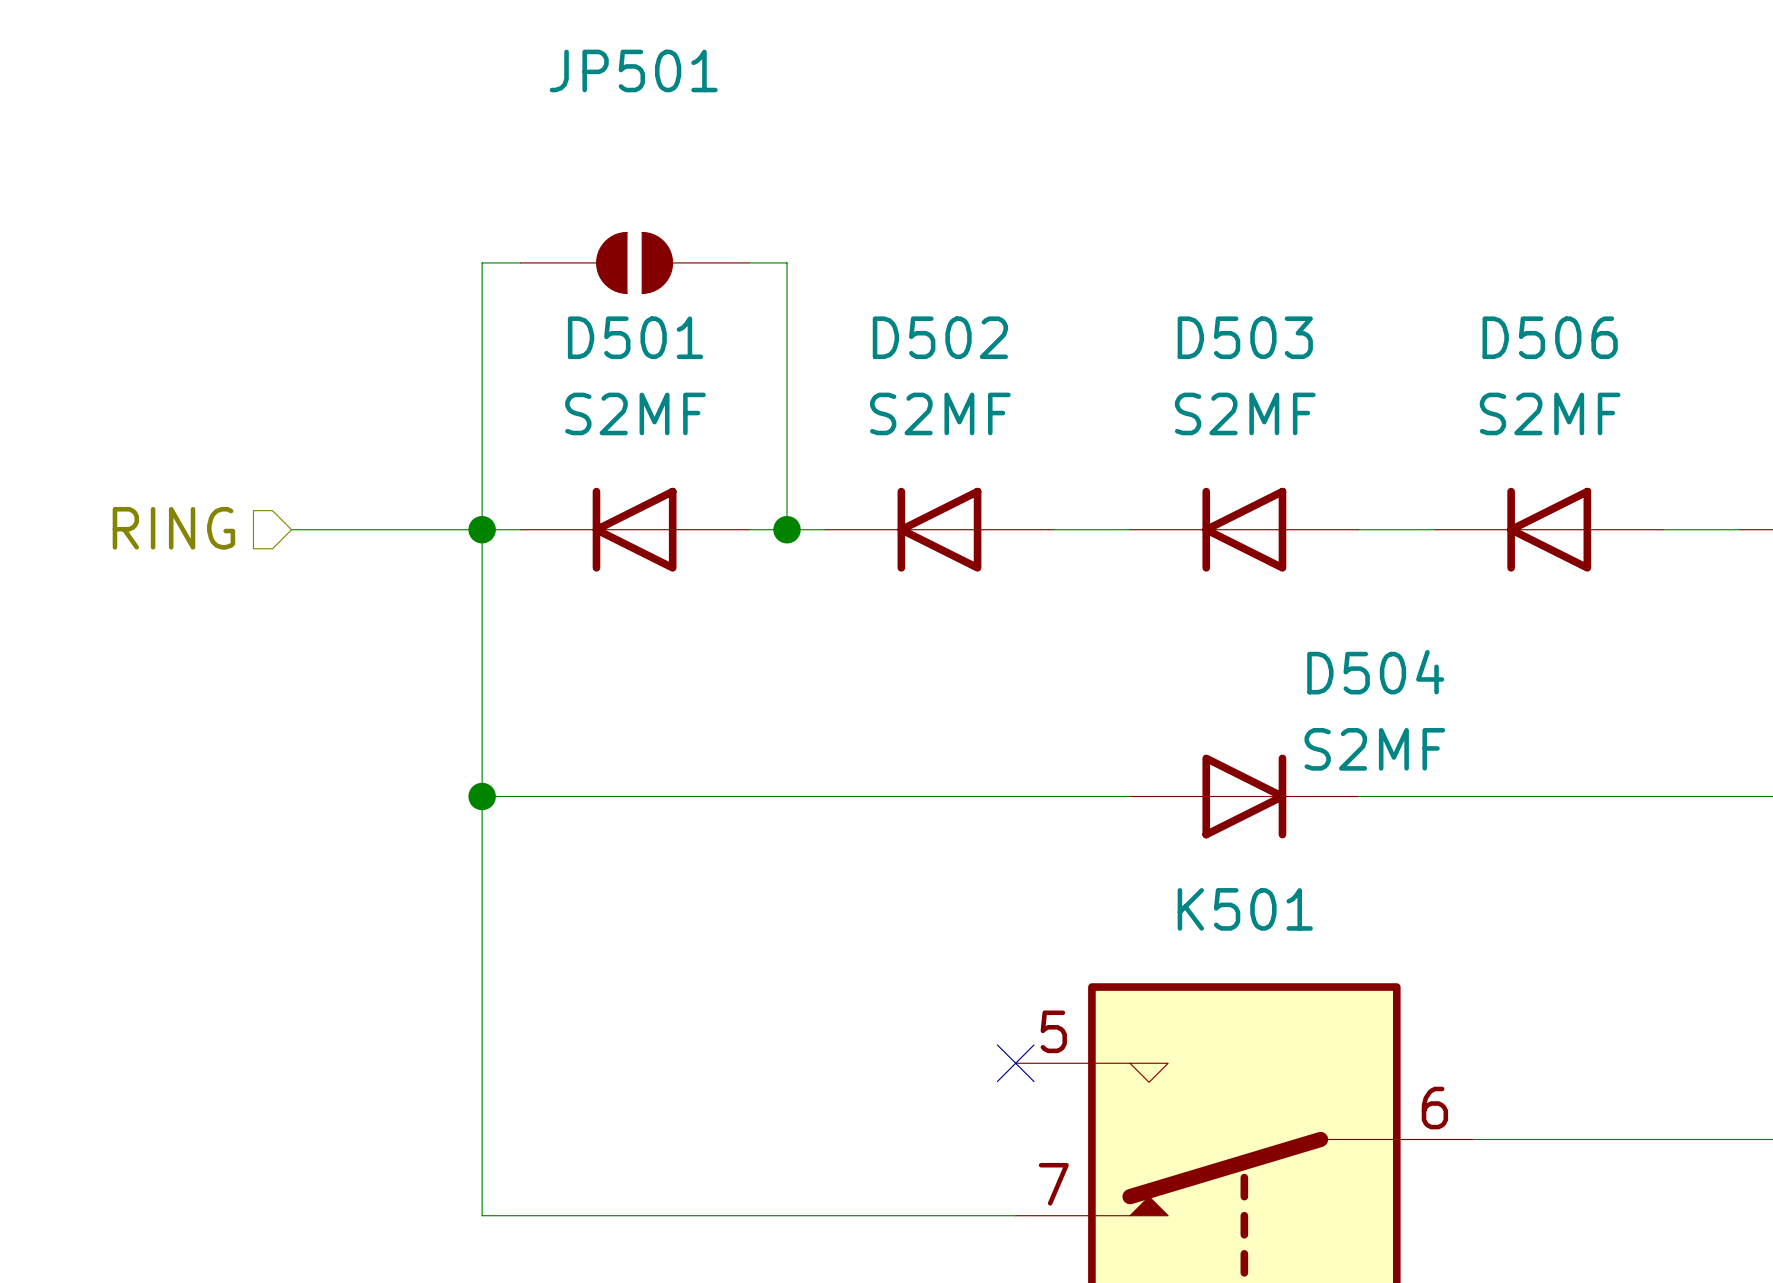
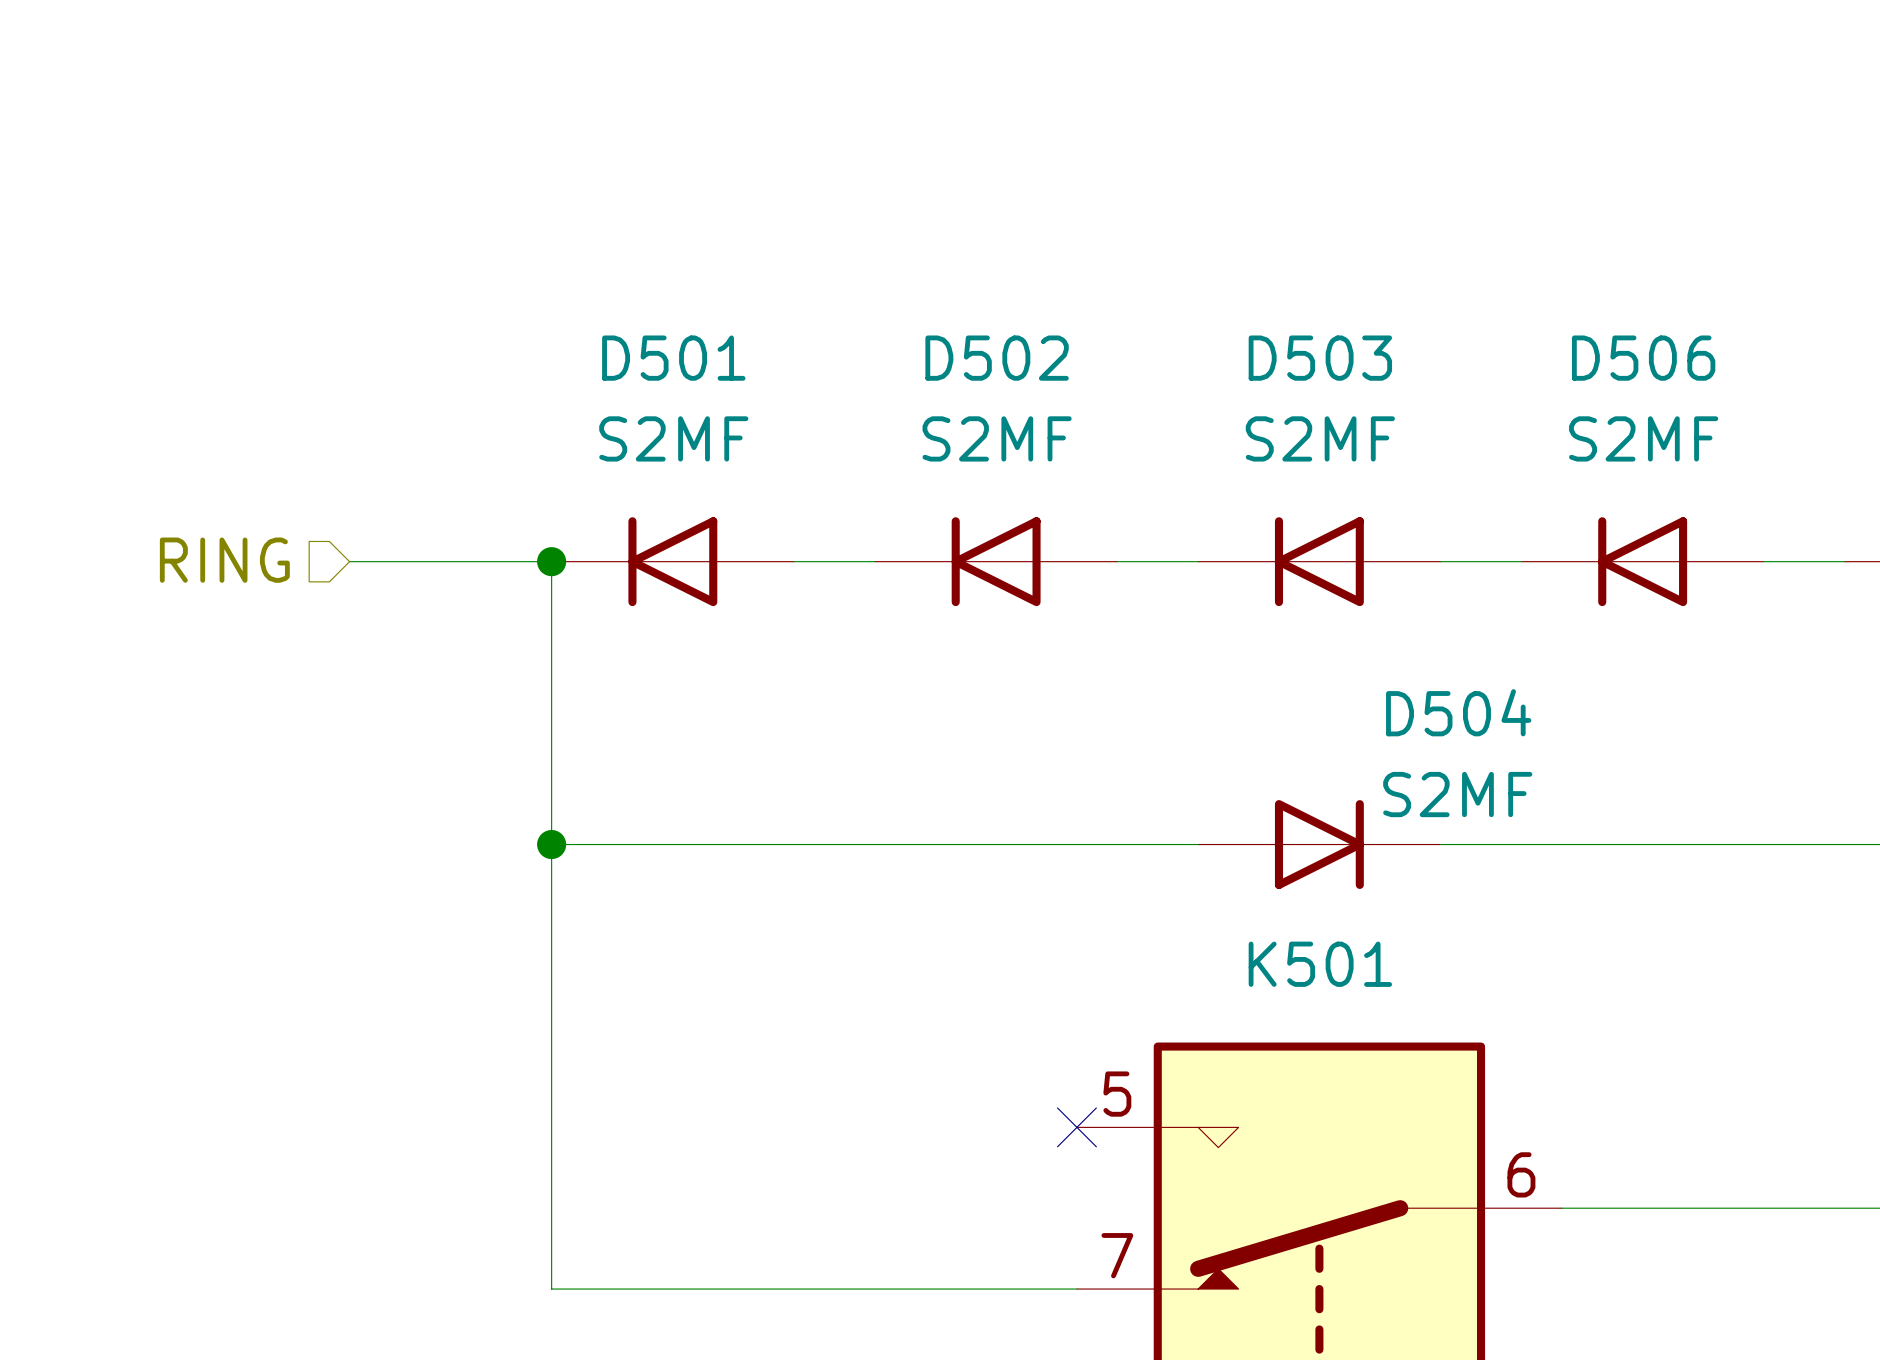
wire: (520, 262) (482, 262) (482, 1215) (520, 1215) -> (551, 561) (551, 1289)
JP501: (634, 262) -> none
wire: (748, 262) (787, 262) (787, 529) -> none
hierarchical label position: RING (173, 528) -> RING (224, 560)
wire: (291, 529) (329, 529) -> none
junction position: (482, 529) -> (551, 561)
junction: (787, 529) -> none
wire: (482, 796) (520, 796) -> none
junction position: (482, 796) -> (551, 844)

